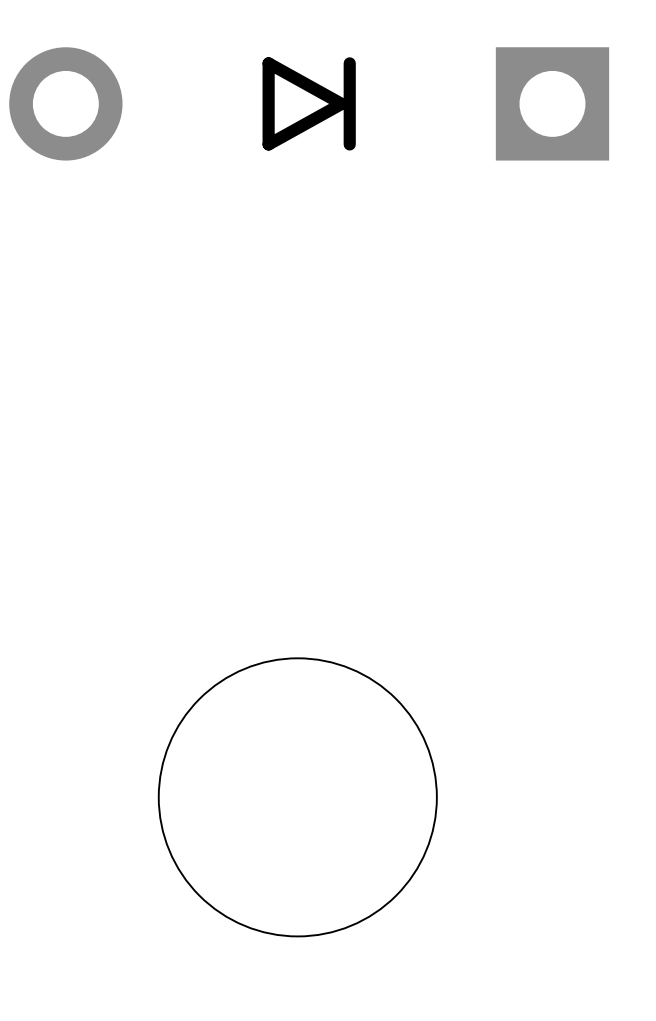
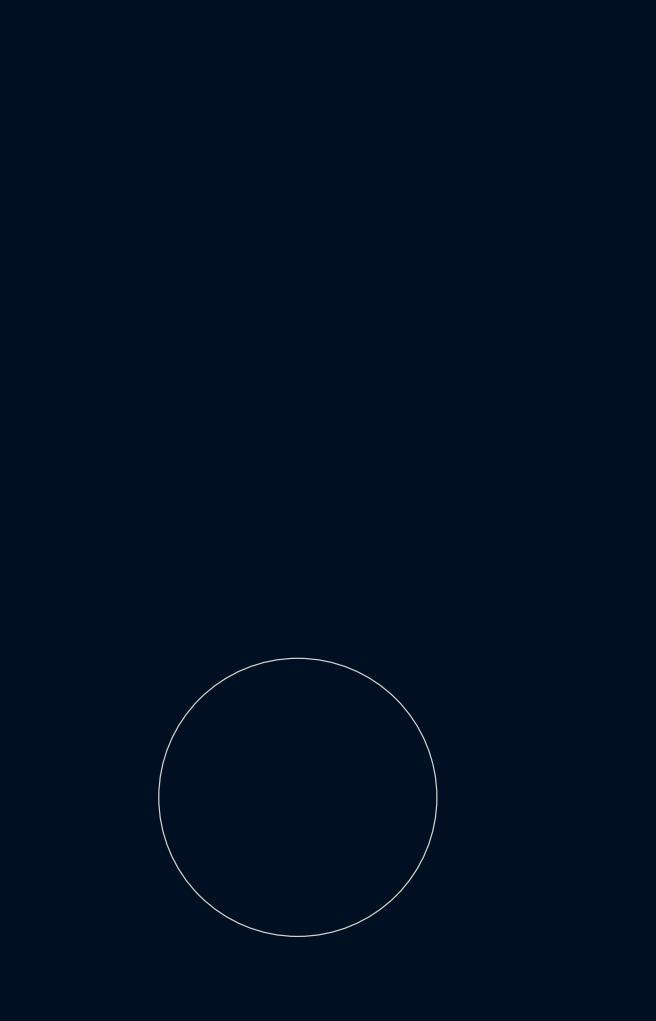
part: (309, 103) -> none

